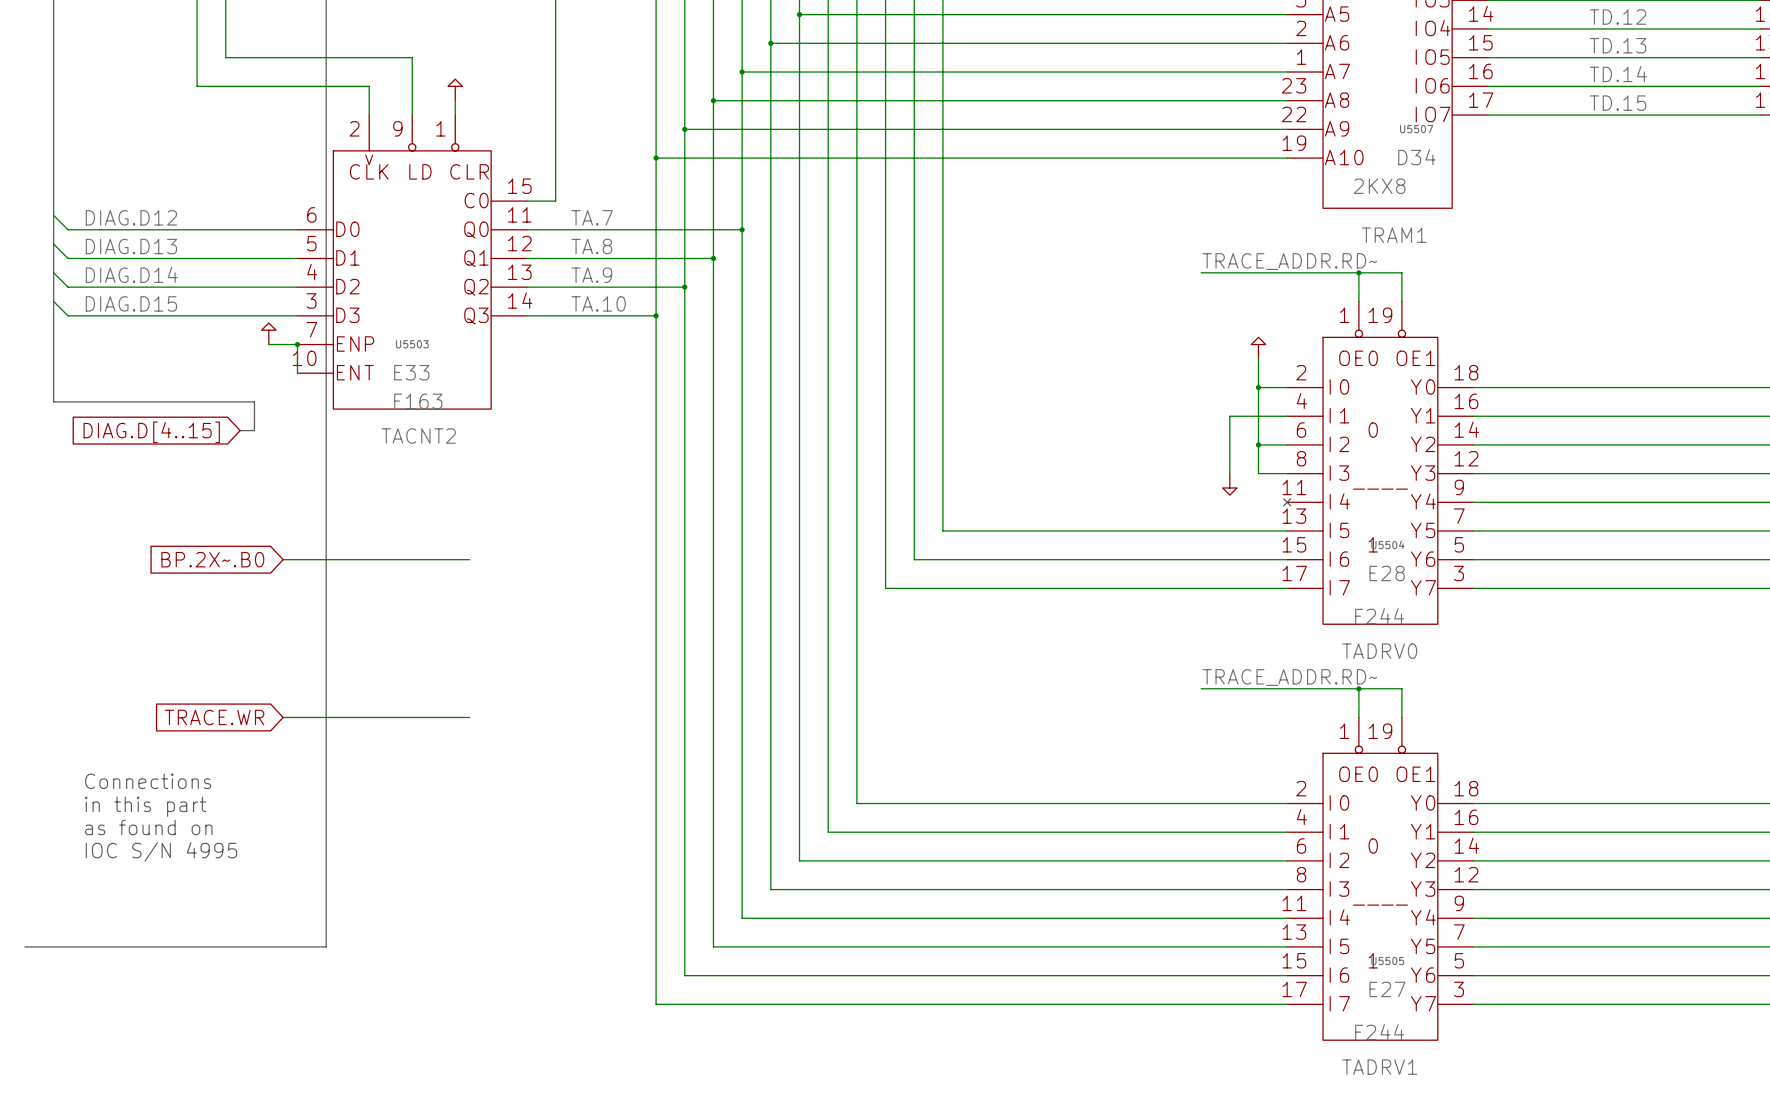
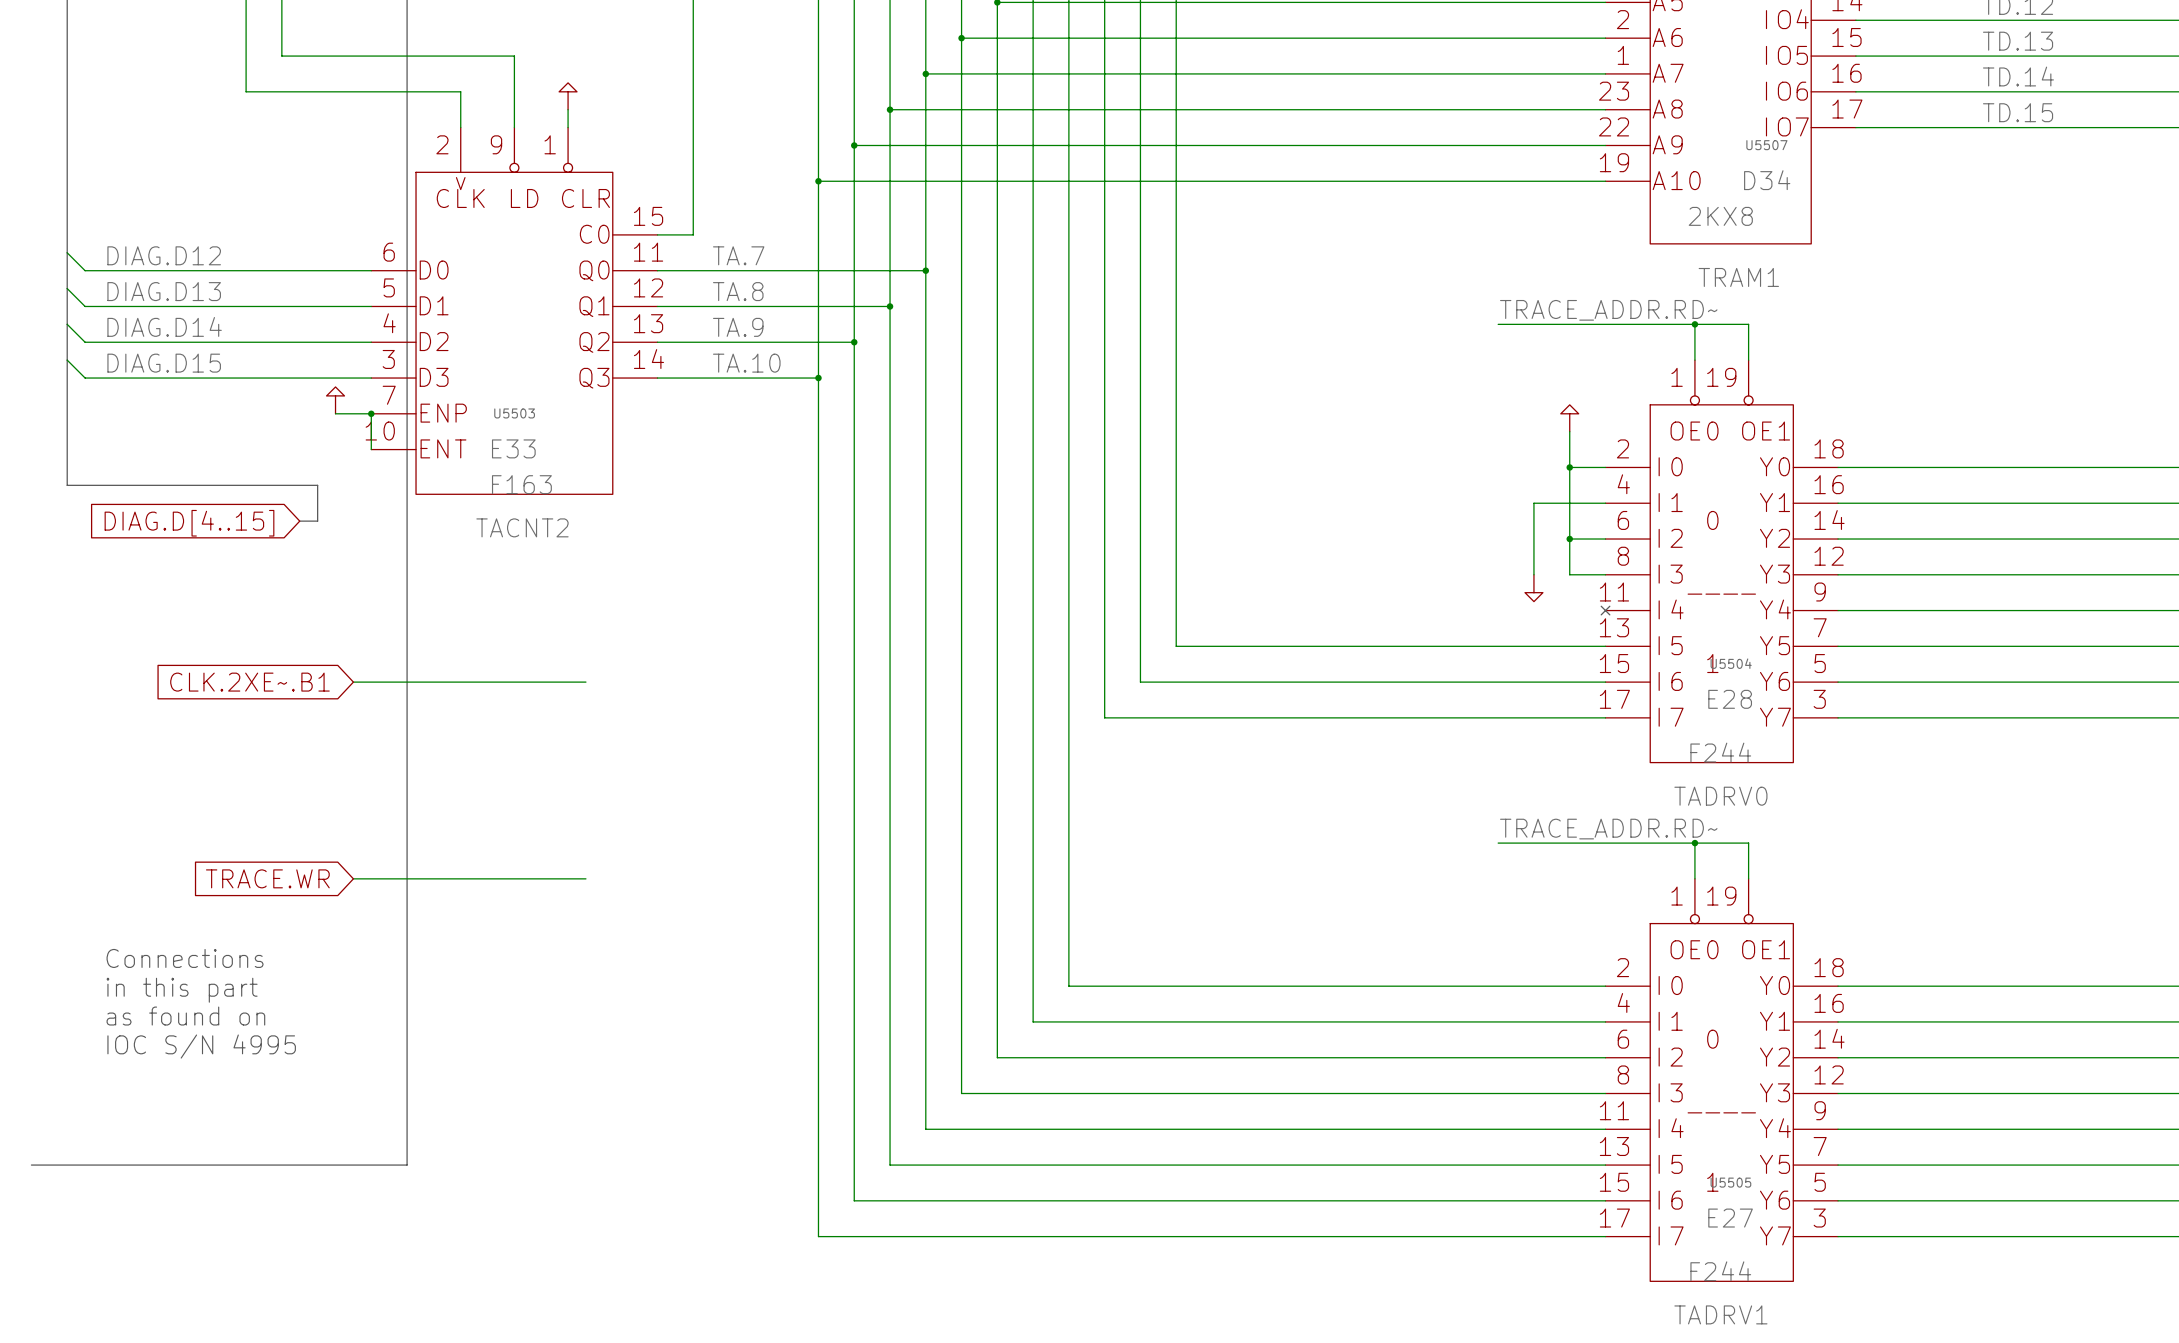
global label: BP.2X~.B0 (212, 559) -> CLK.2XE~.B1 (249, 682)

